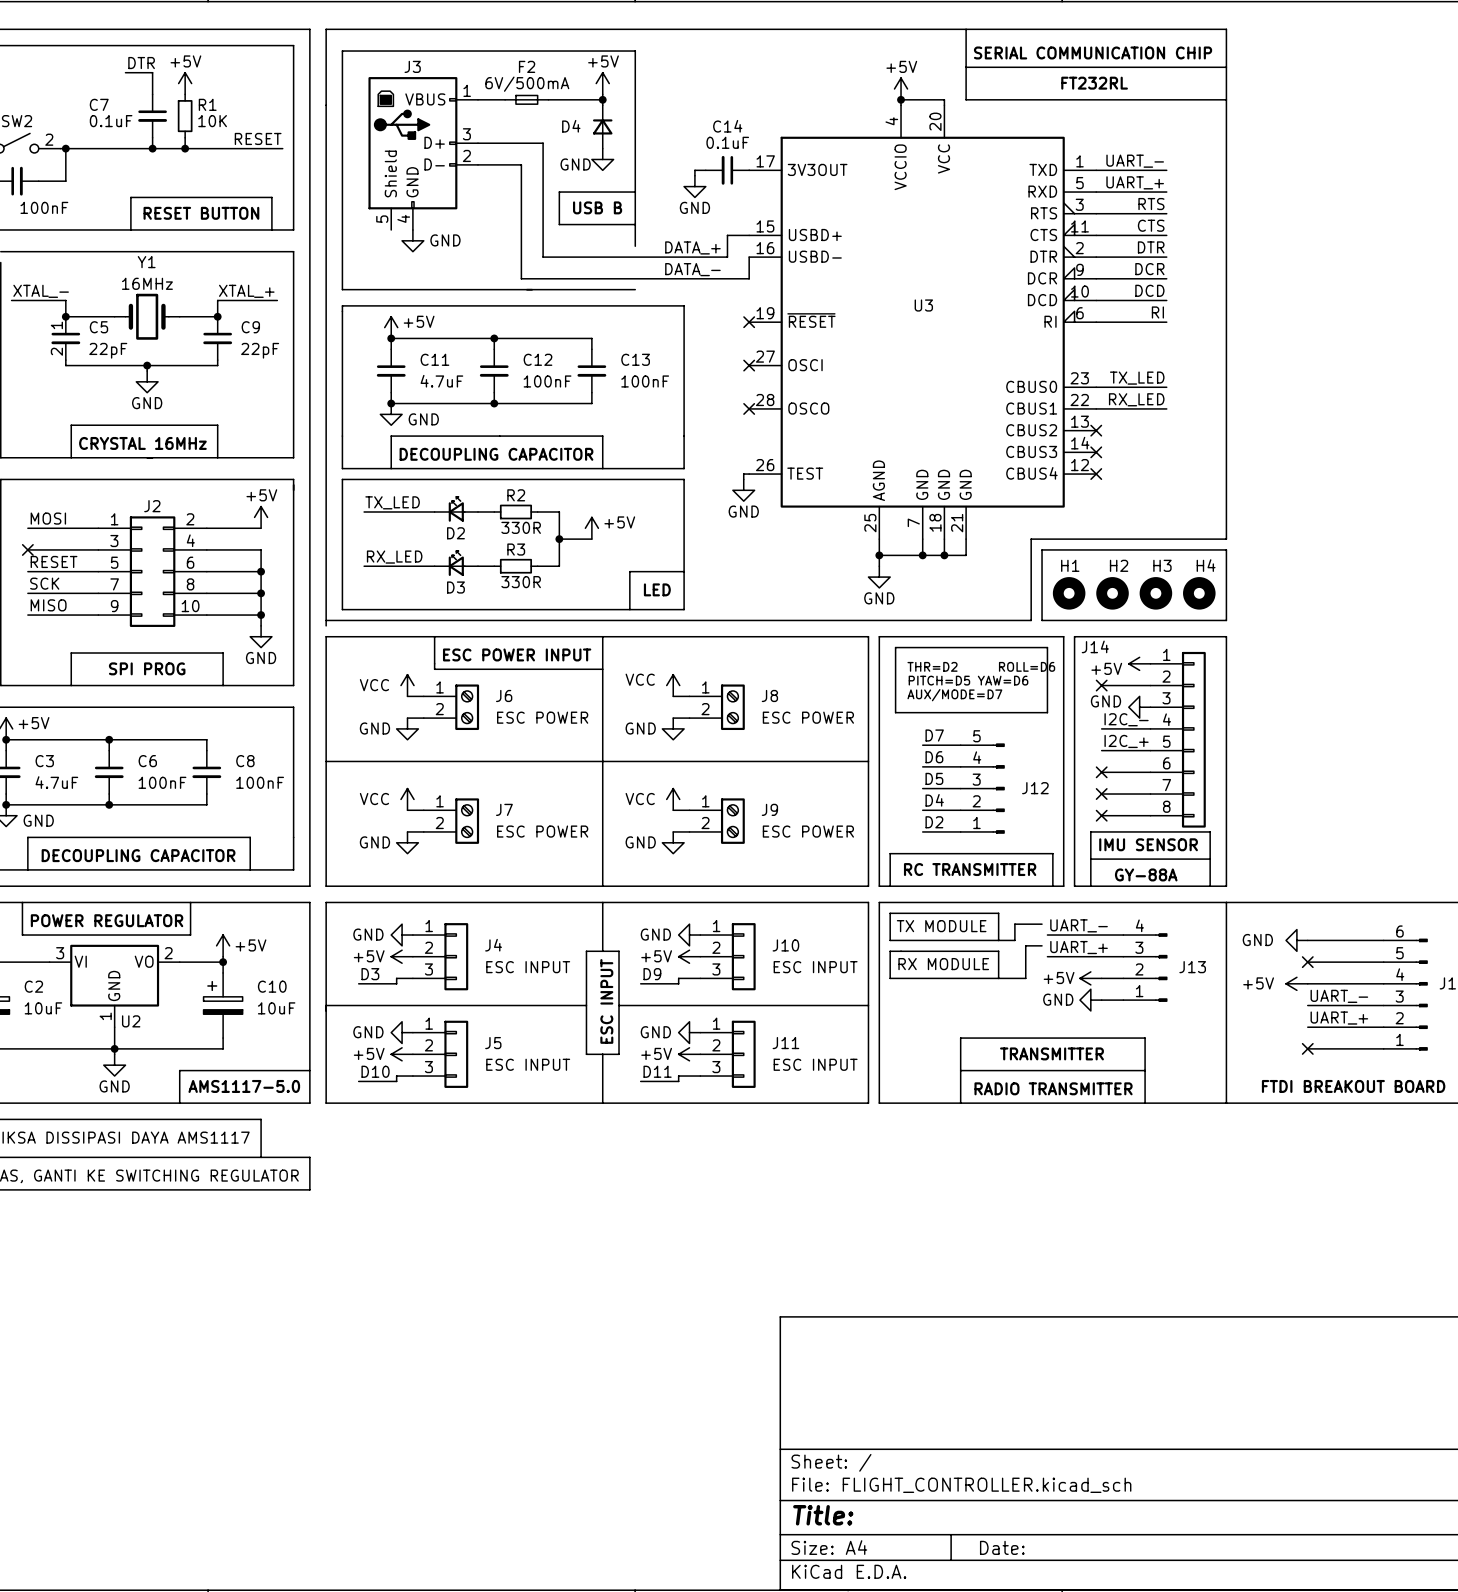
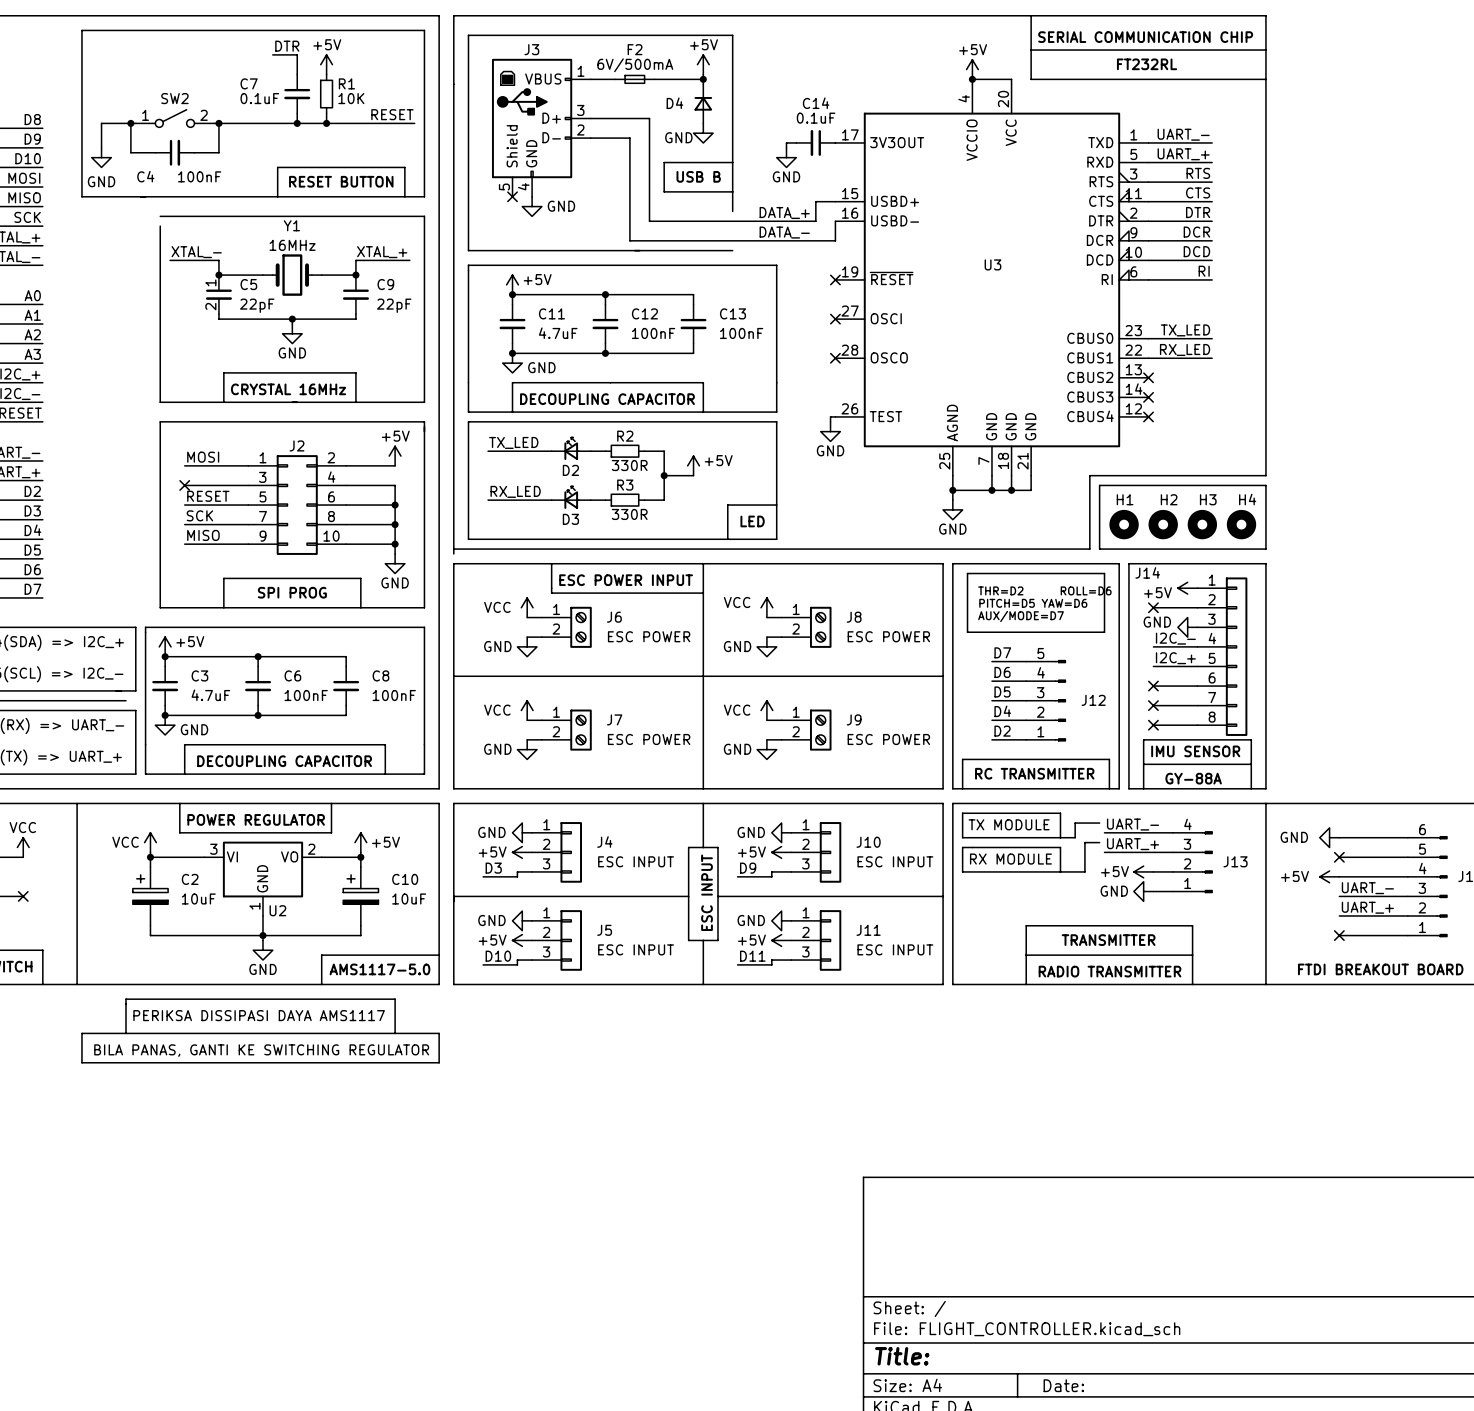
no-connect mark: none -> (512, 196)

